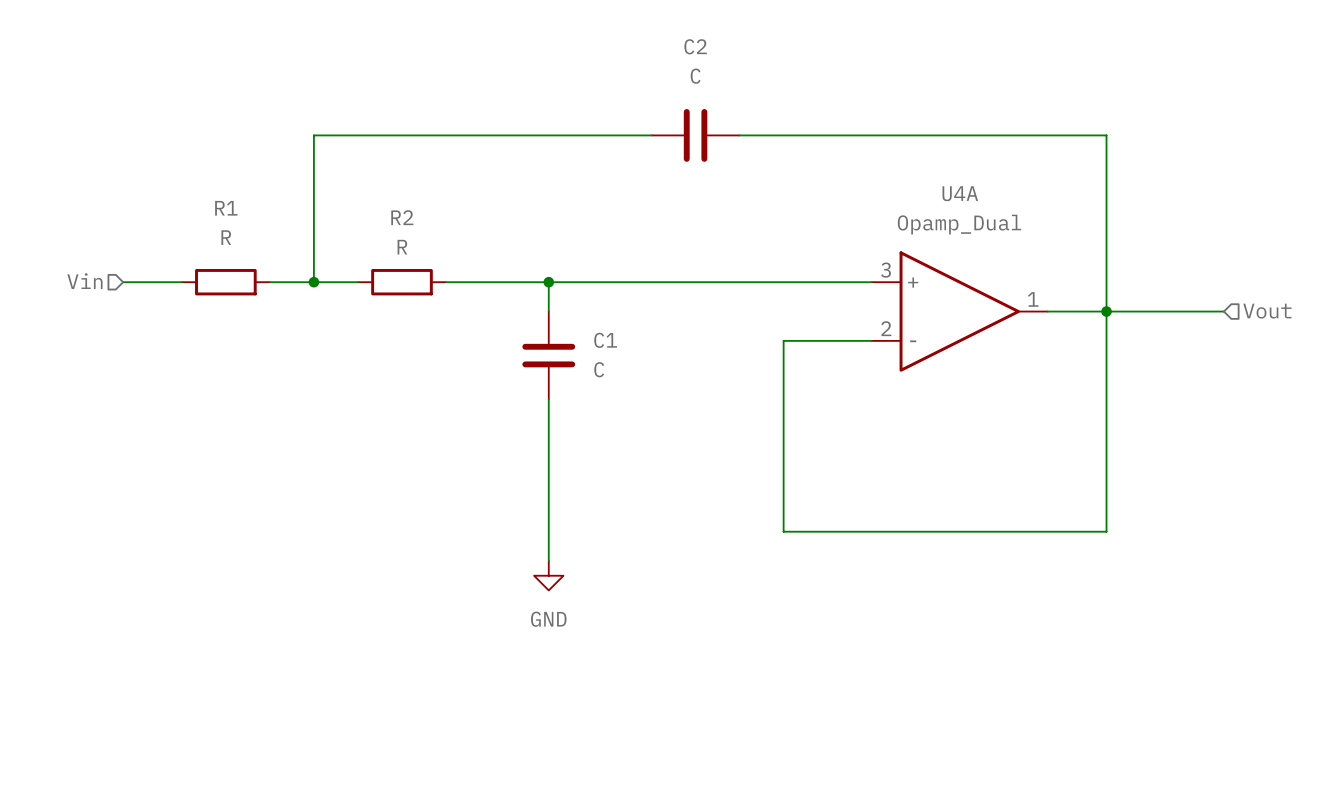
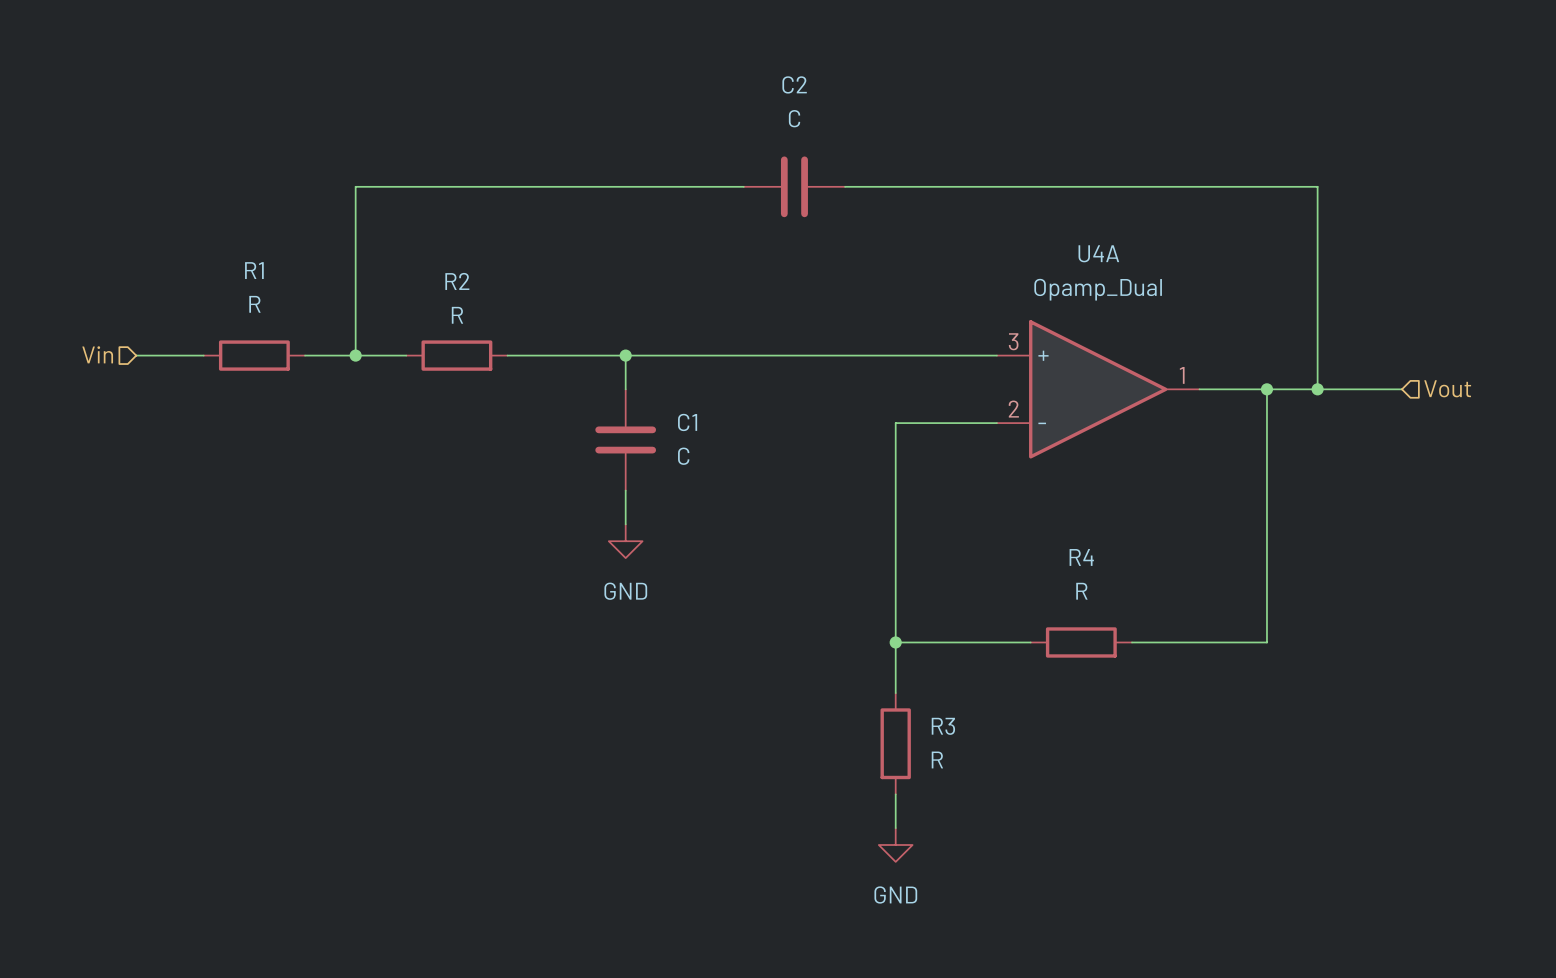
wire: (1106, 135) (1106, 311) -> (1266, 186) (1317, 186) (1317, 389)
junction: none -> (1317, 389)
wire: (548, 428) (548, 561) -> none
wire: none -> (895, 642) (895, 693)
junction: none -> (895, 642)
wire: (901, 531) (989, 531) -> none
R4: none -> R (1081, 642)
power symbol position: GND (548, 575) -> GND (625, 541)
R3: none -> R (895, 743)
wire: none -> (895, 794) (895, 828)
power symbol: none -> GND (895, 845)

